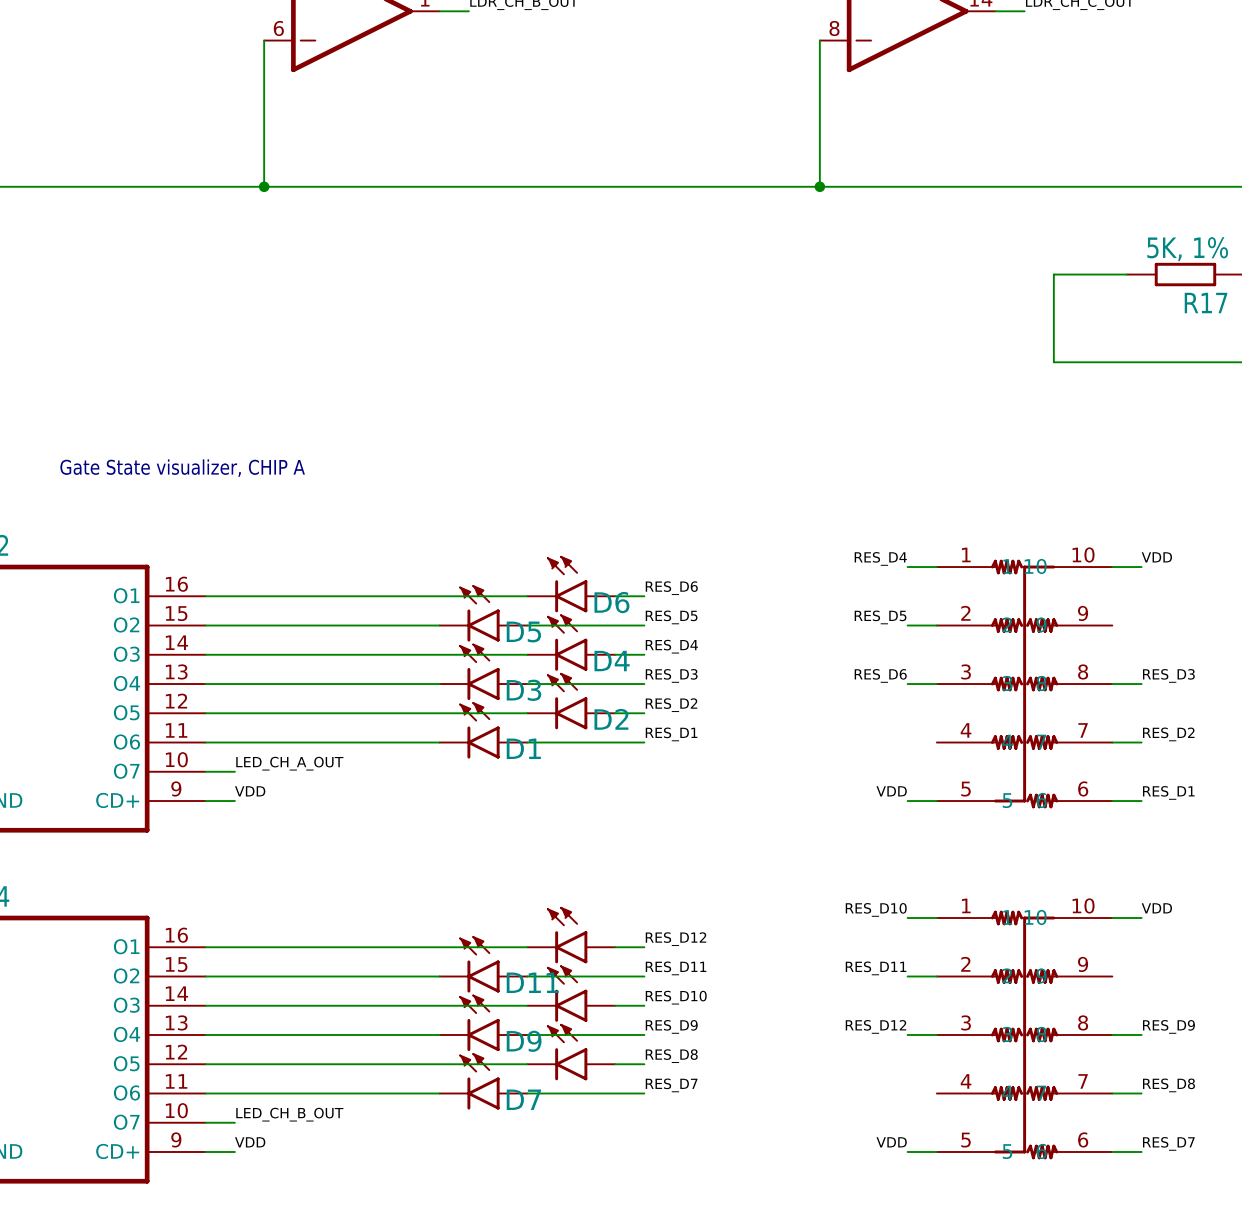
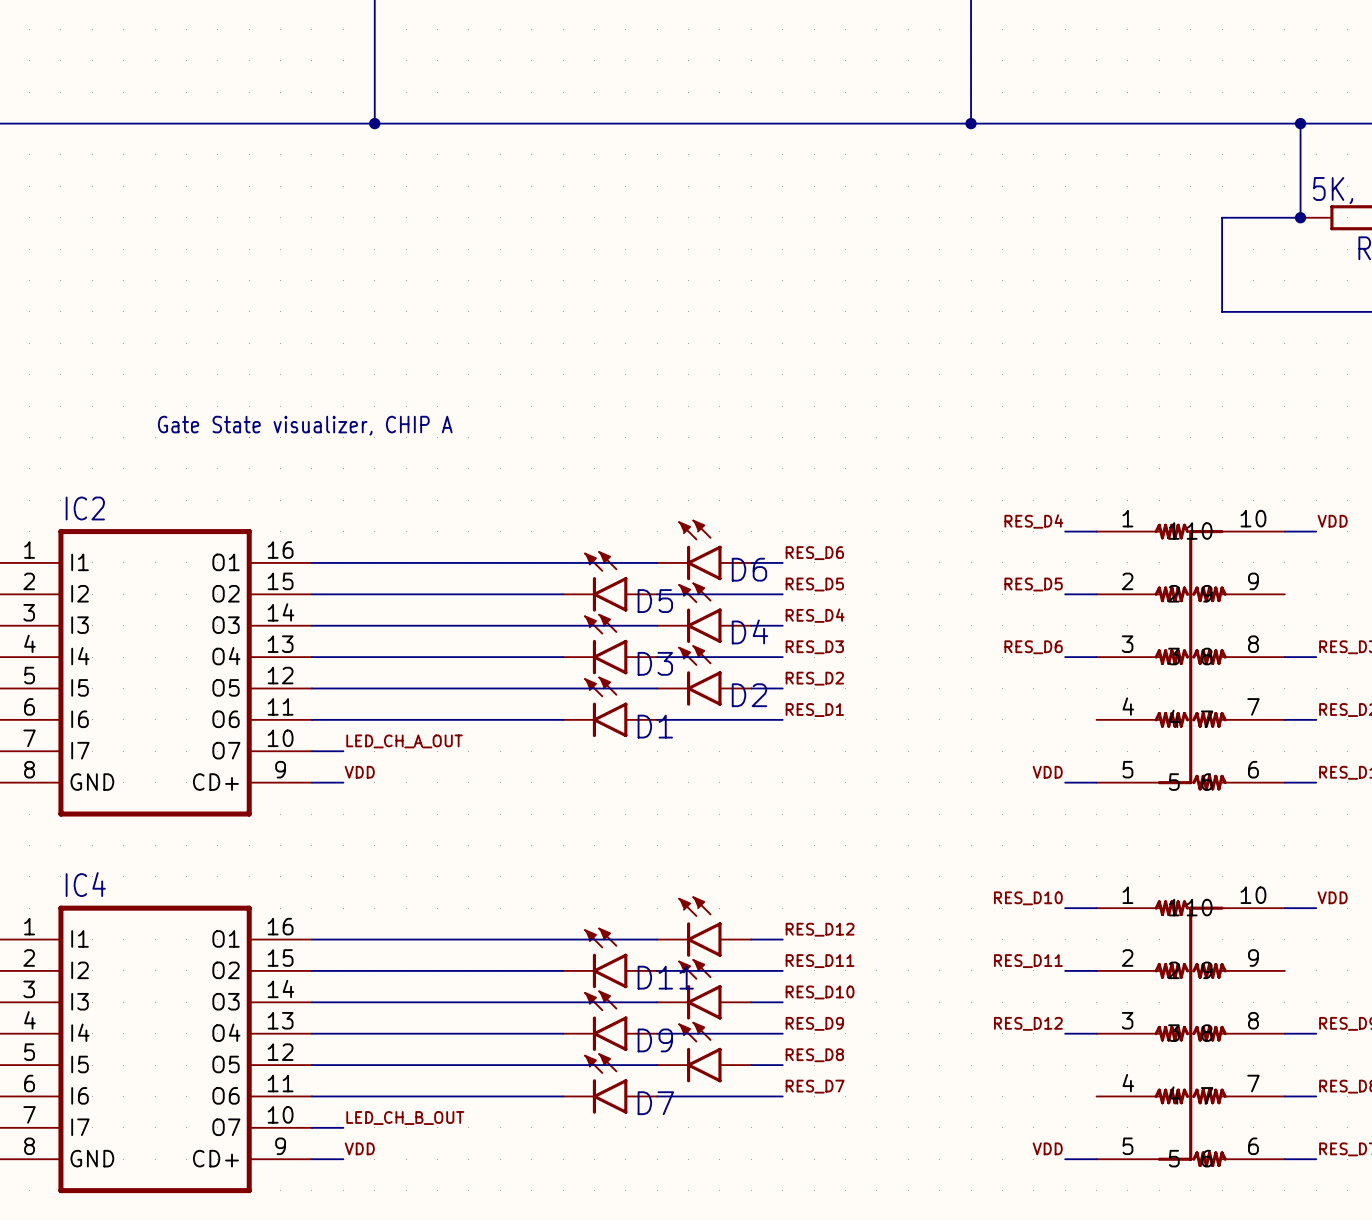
wire: none -> (1300, 123) (1300, 217)
junction: none -> (1300, 123)
junction: none -> (1300, 217)

